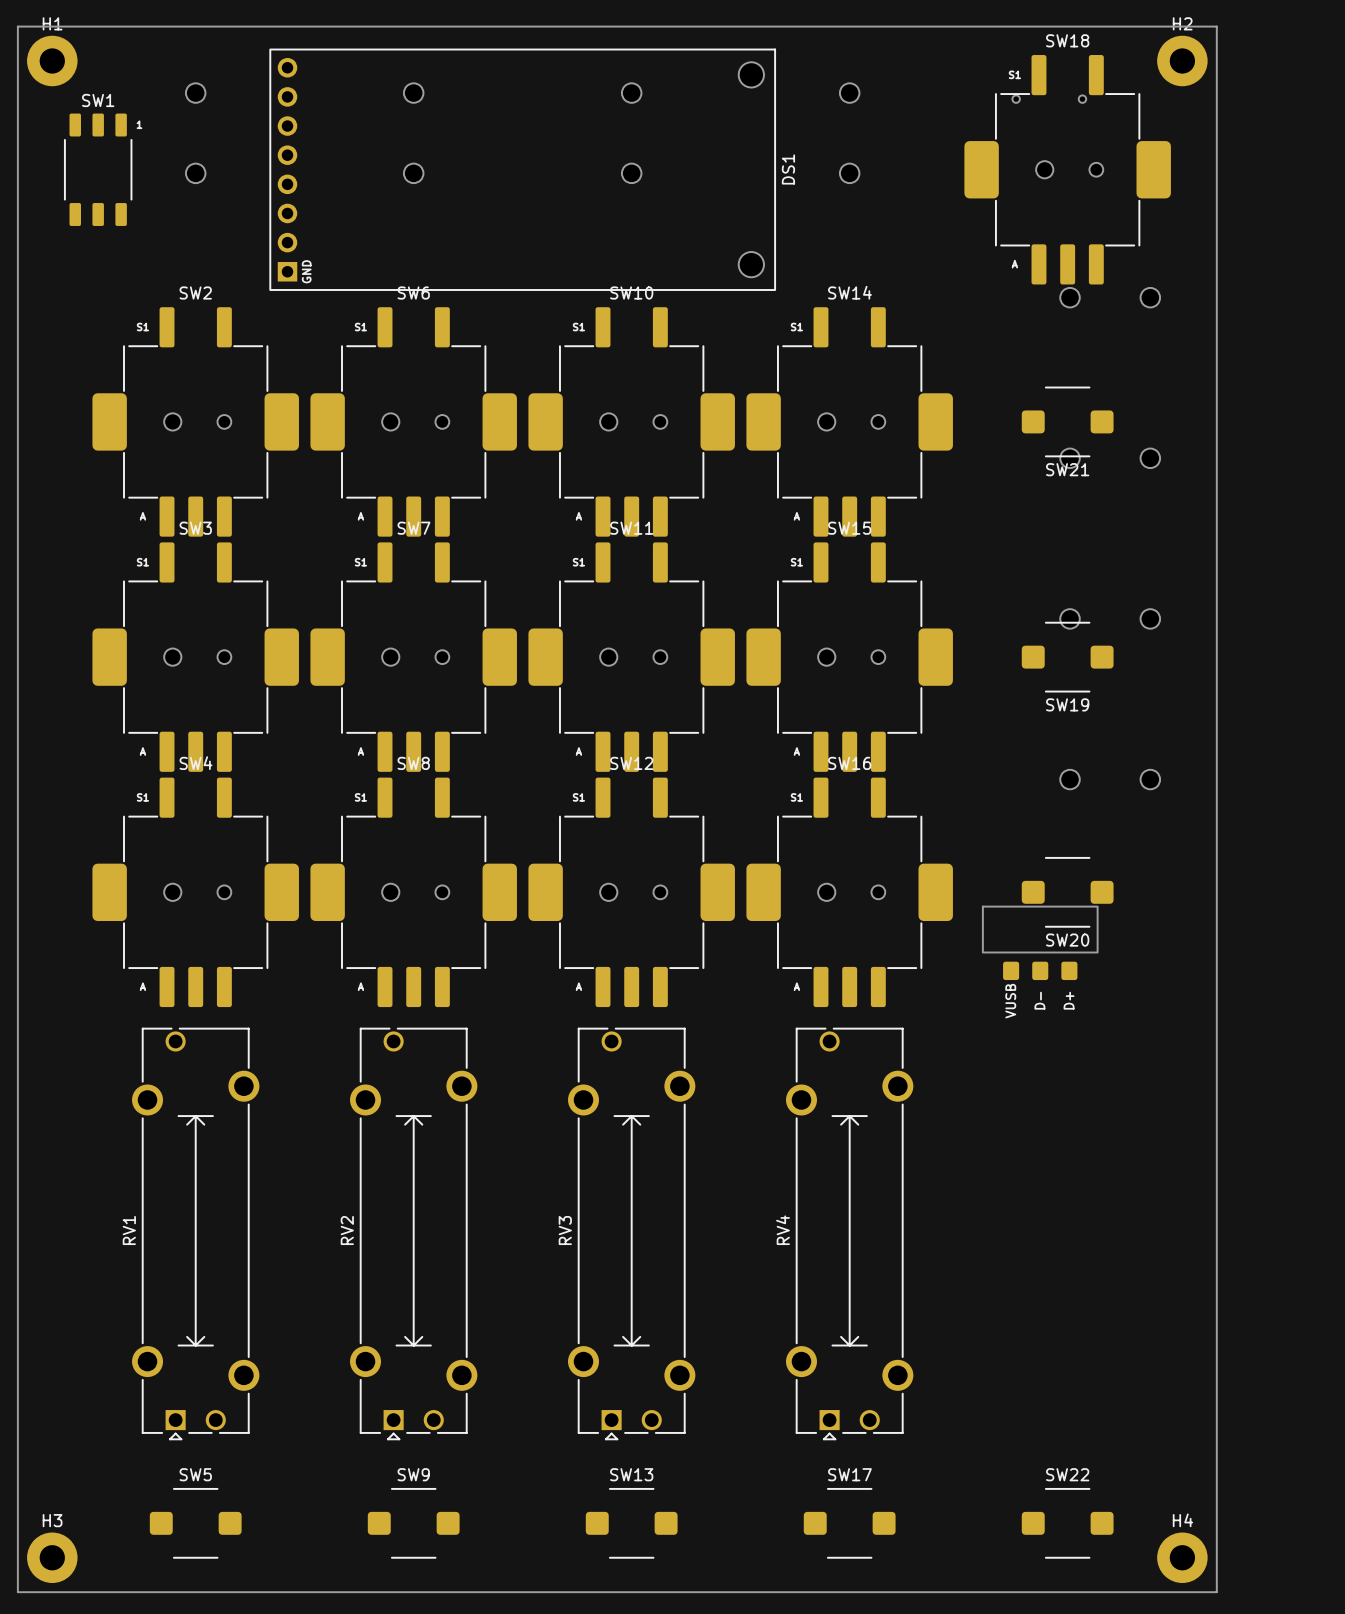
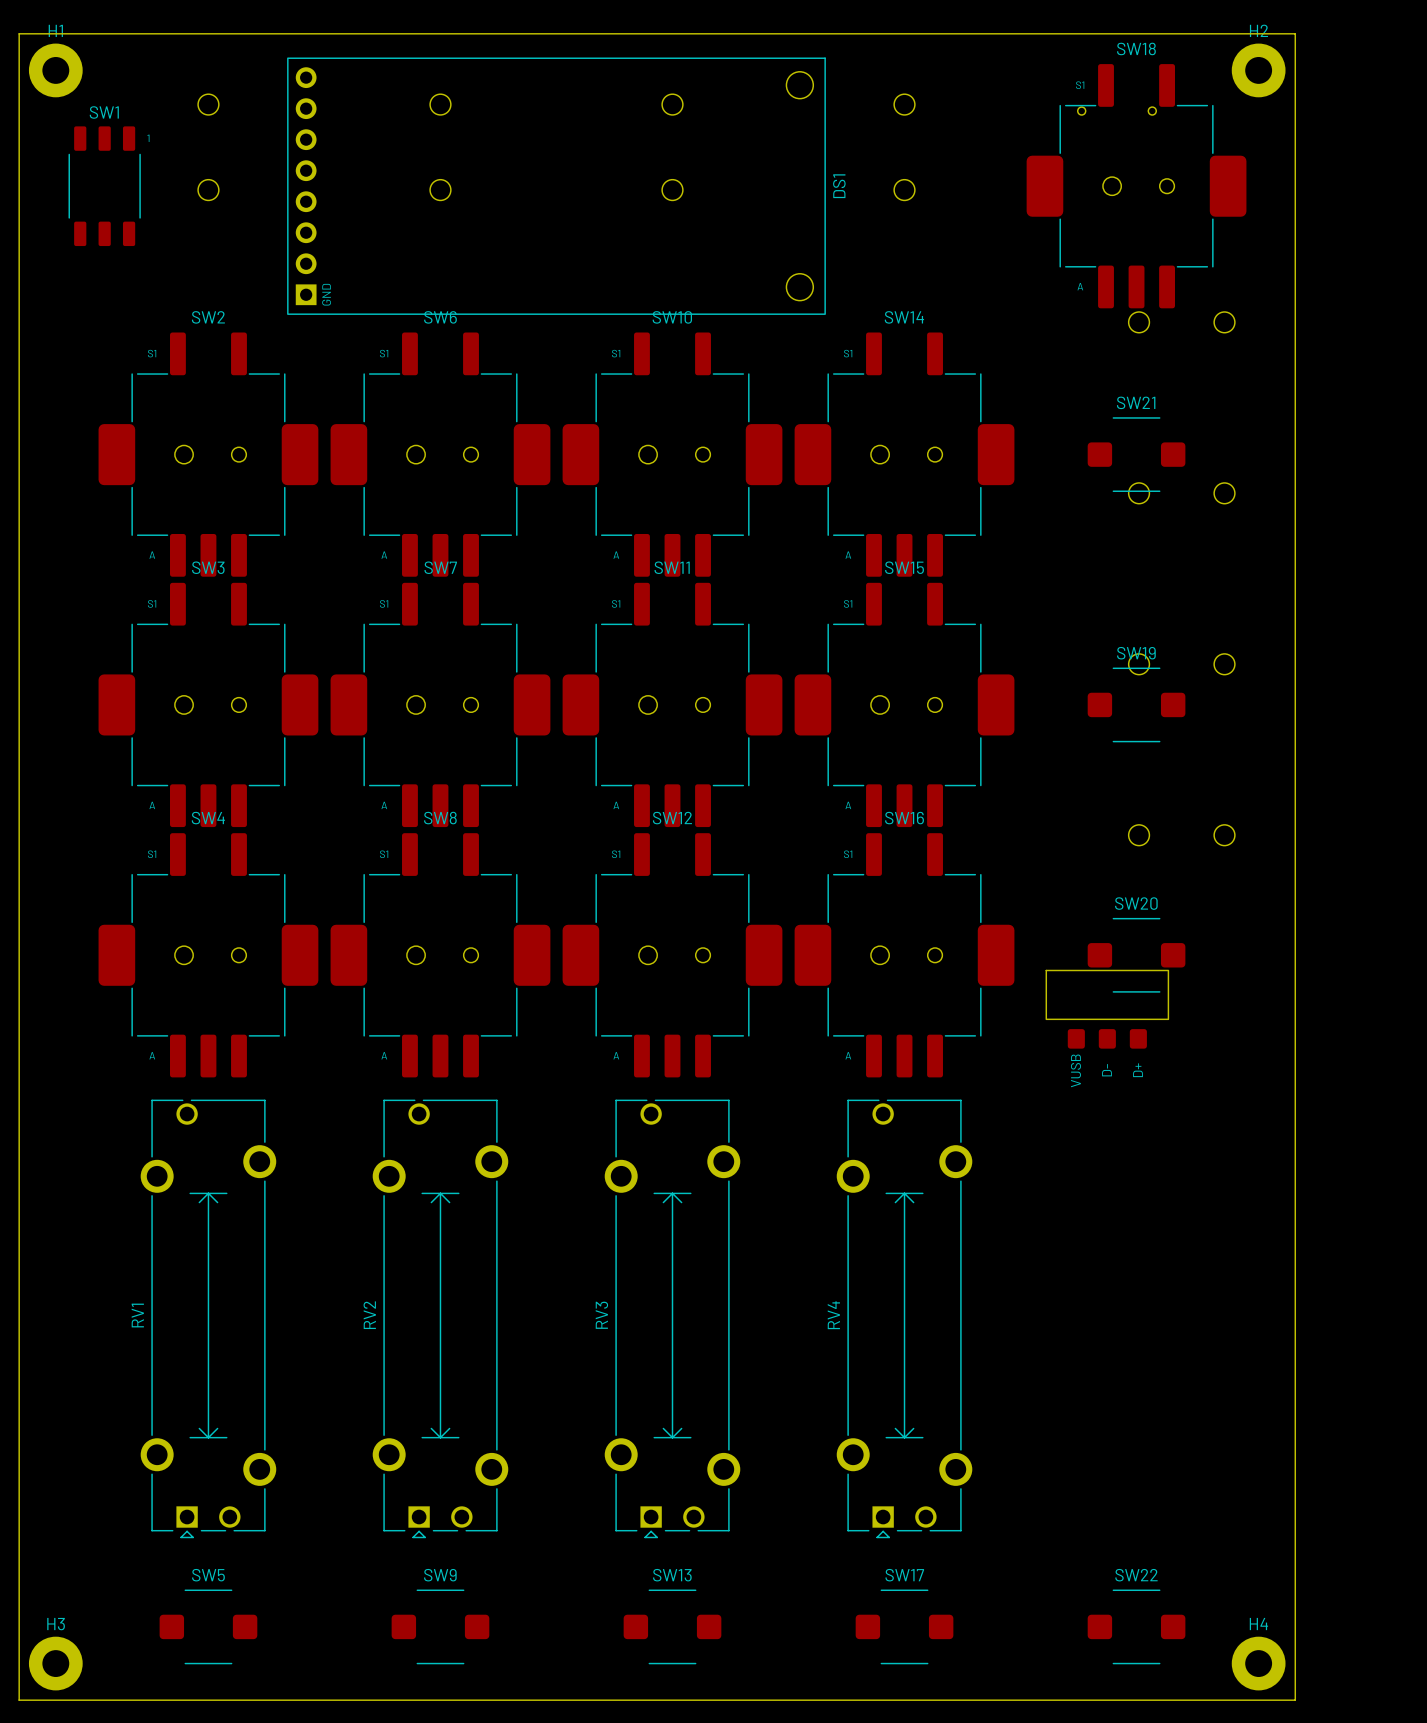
SW21 name position: SW21 (1067, 469) -> SW21 (1136, 402)
SW19 name position: SW19 (1067, 704) -> SW19 (1136, 653)
SW20 name position: SW20 (1067, 940) -> SW20 (1136, 903)

